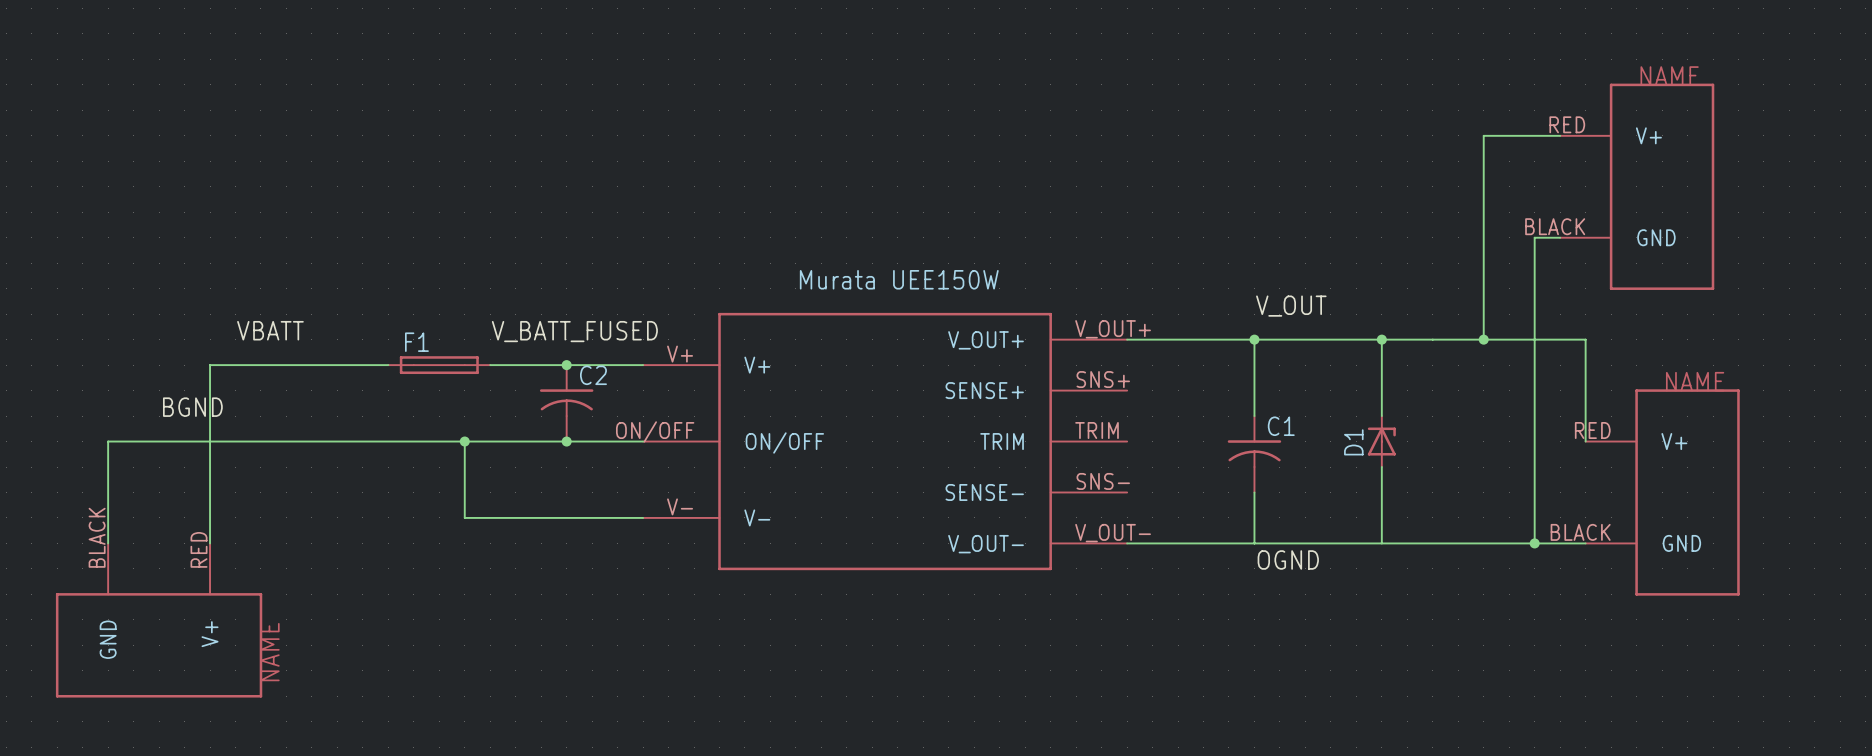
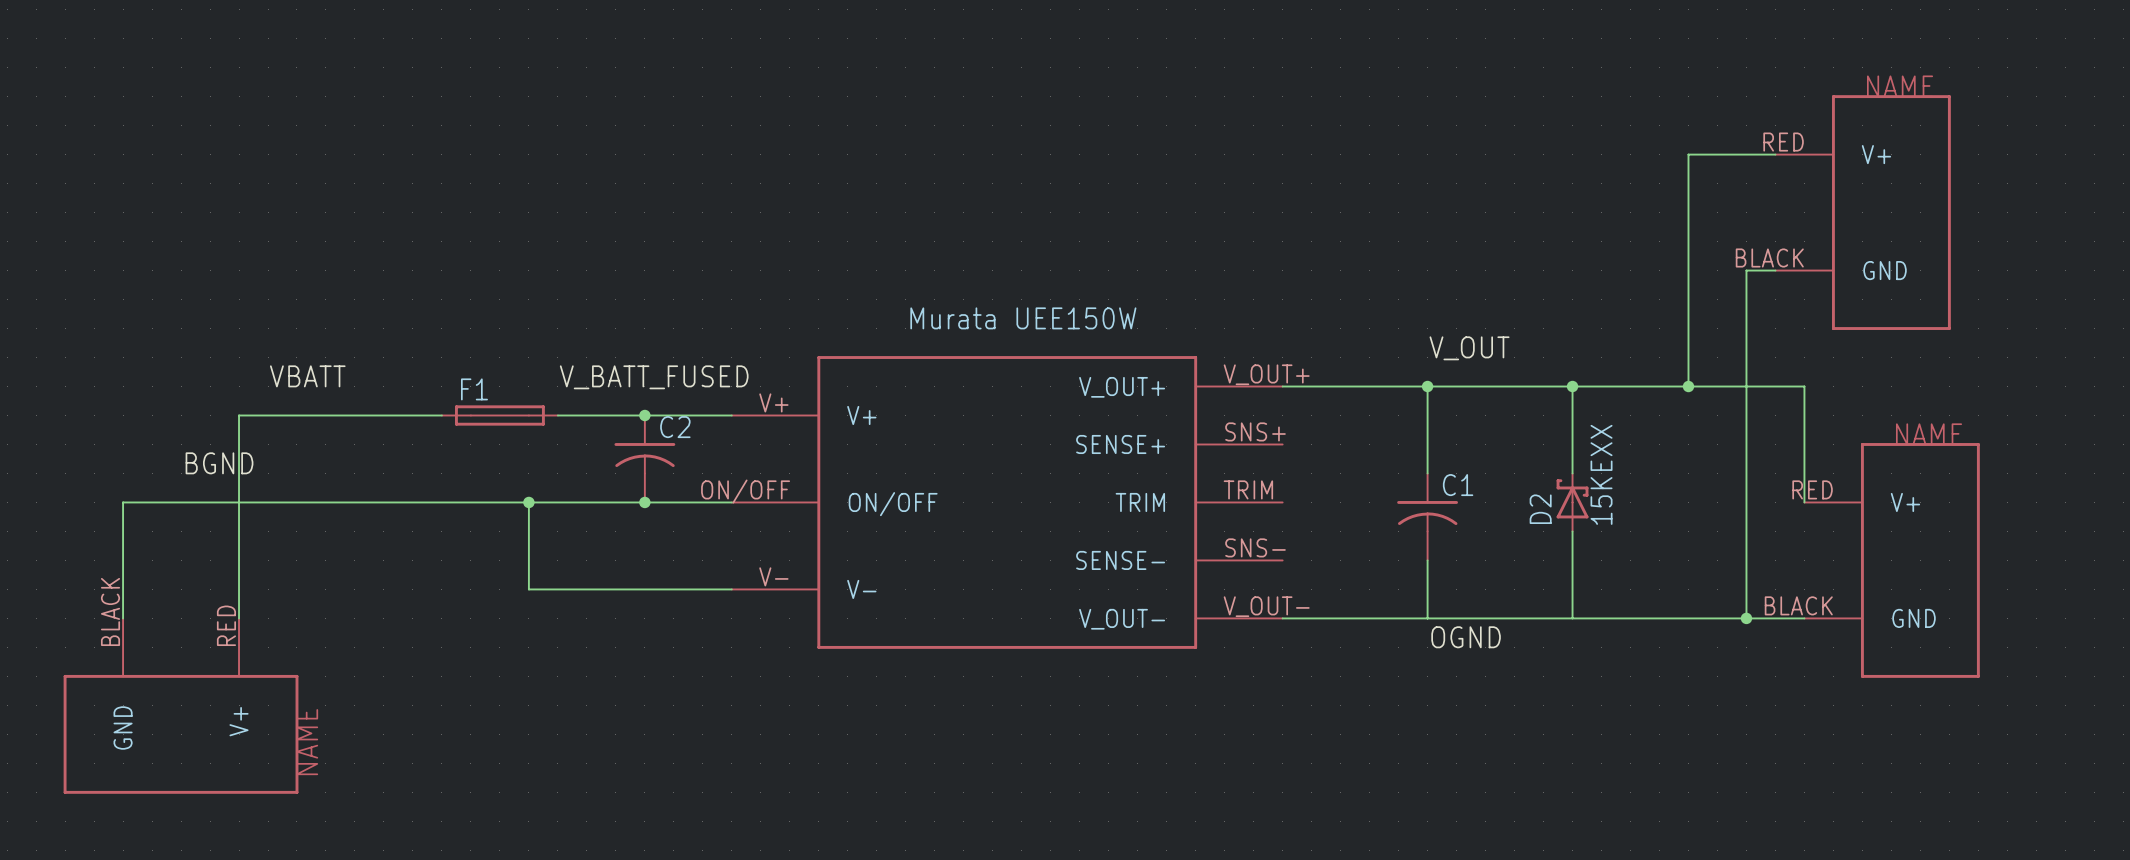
D1: (1381, 441) -> none
D2: none -> 15KEXX (1572, 502)

